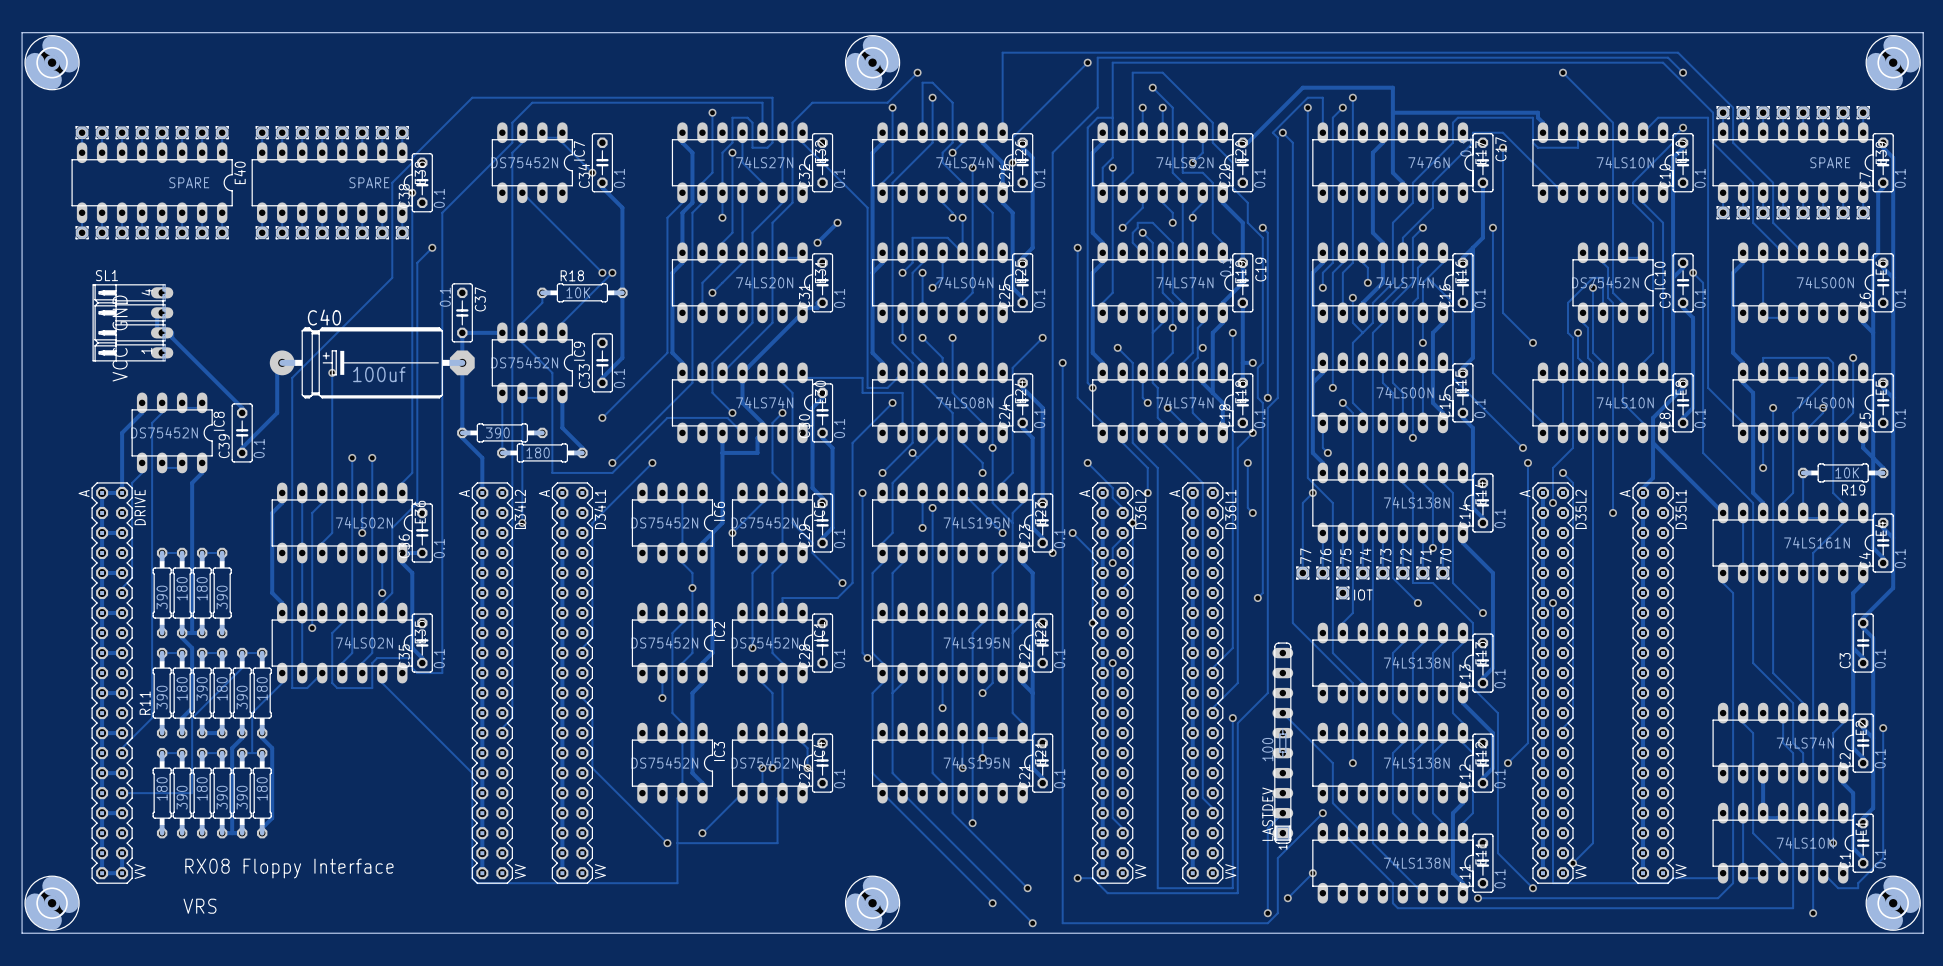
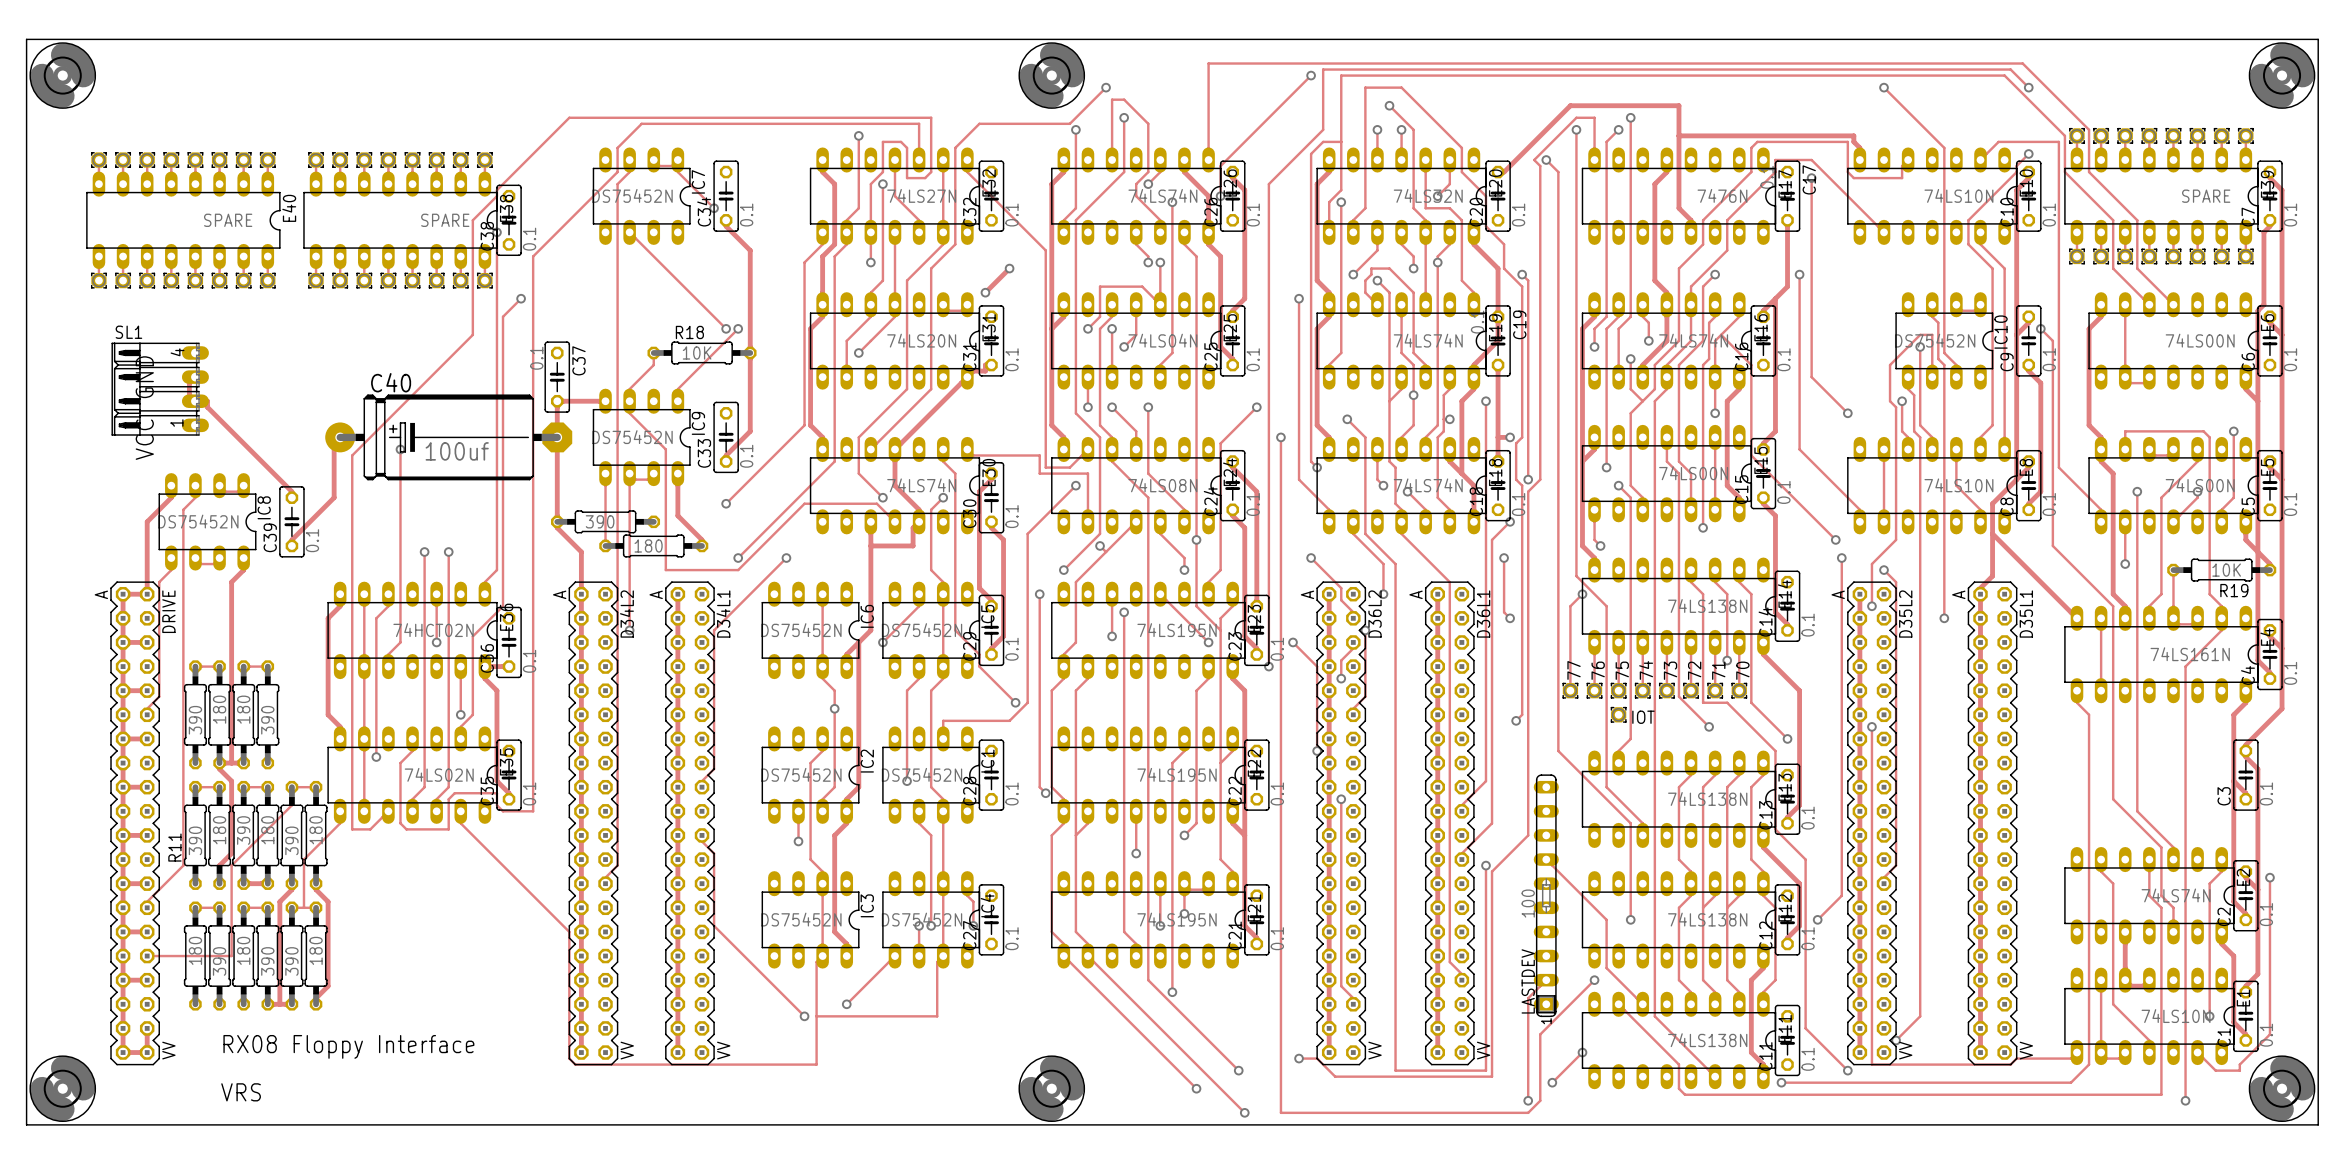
E36 value: 74LS02N (364, 522) -> 74HCT02N (433, 630)

